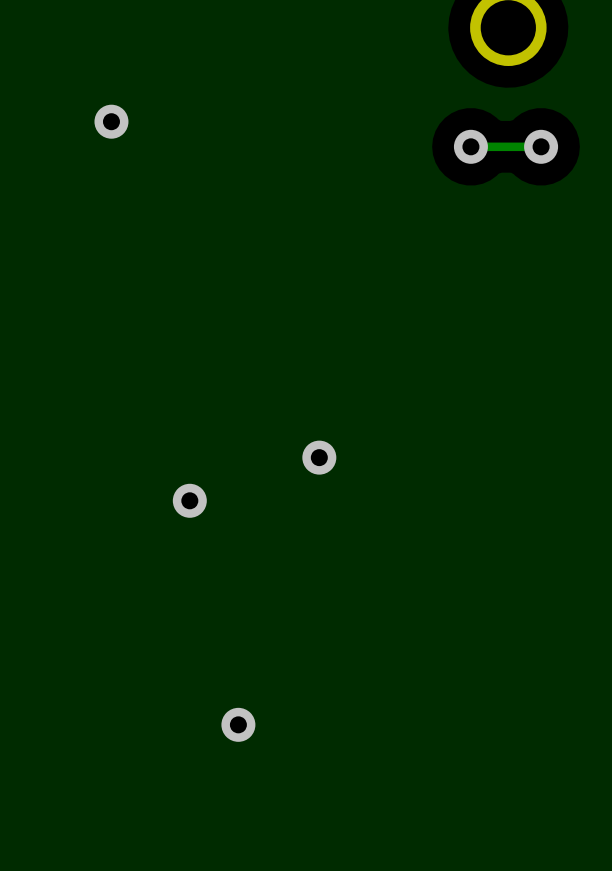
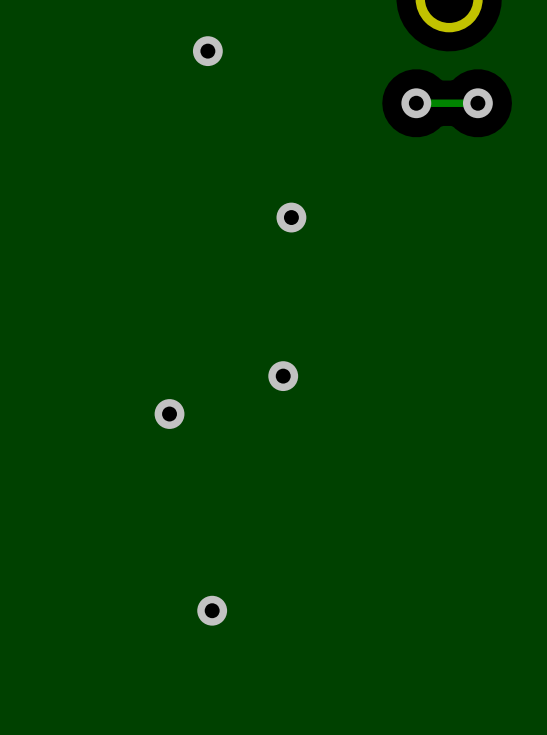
via: none -> (207, 51)
via: (111, 121) -> none
via: none -> (291, 217)

